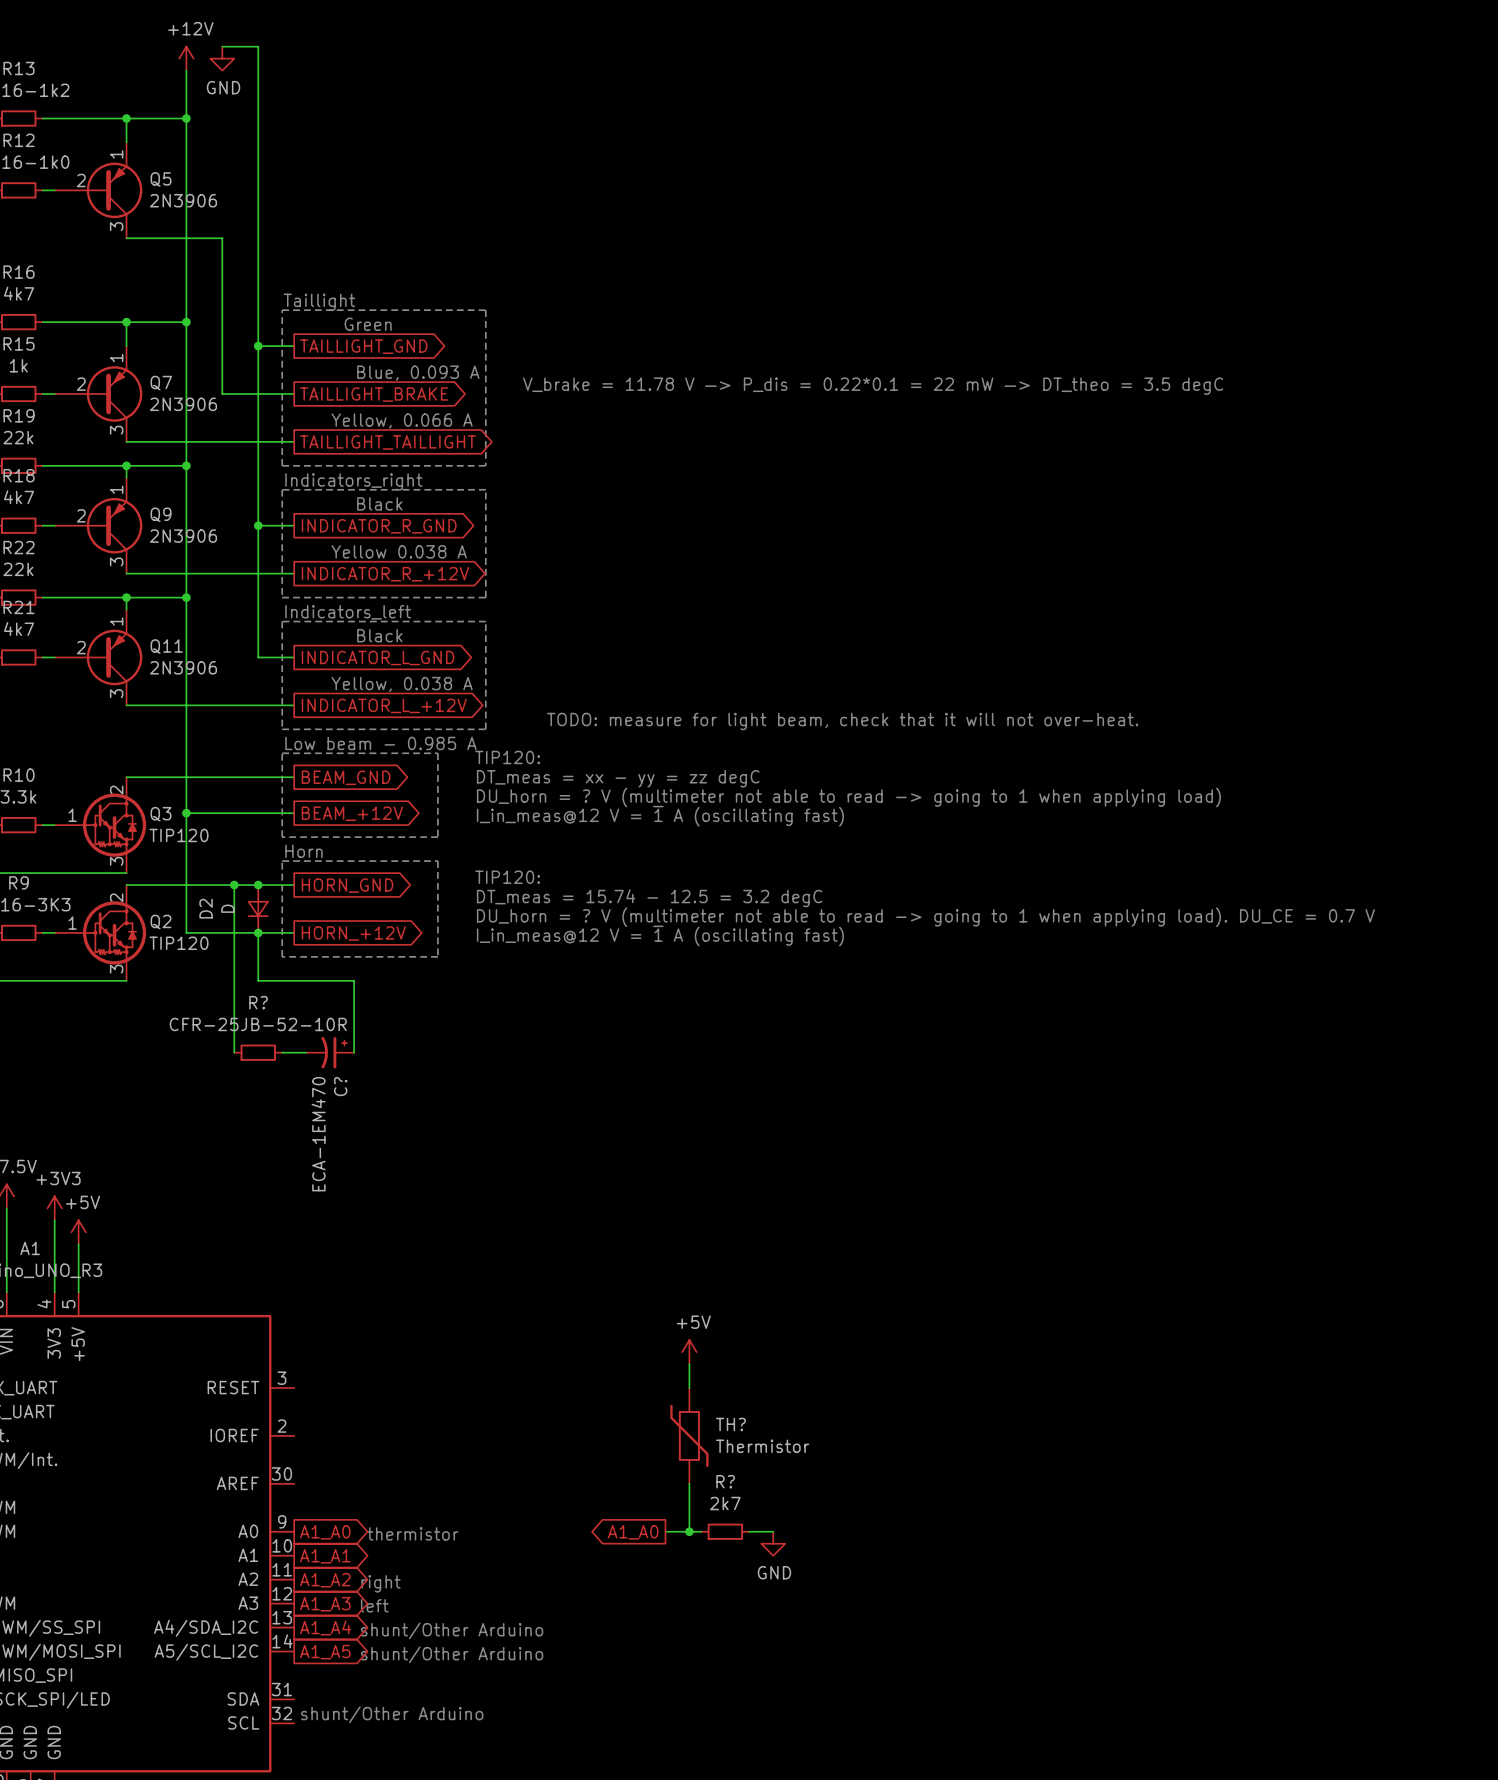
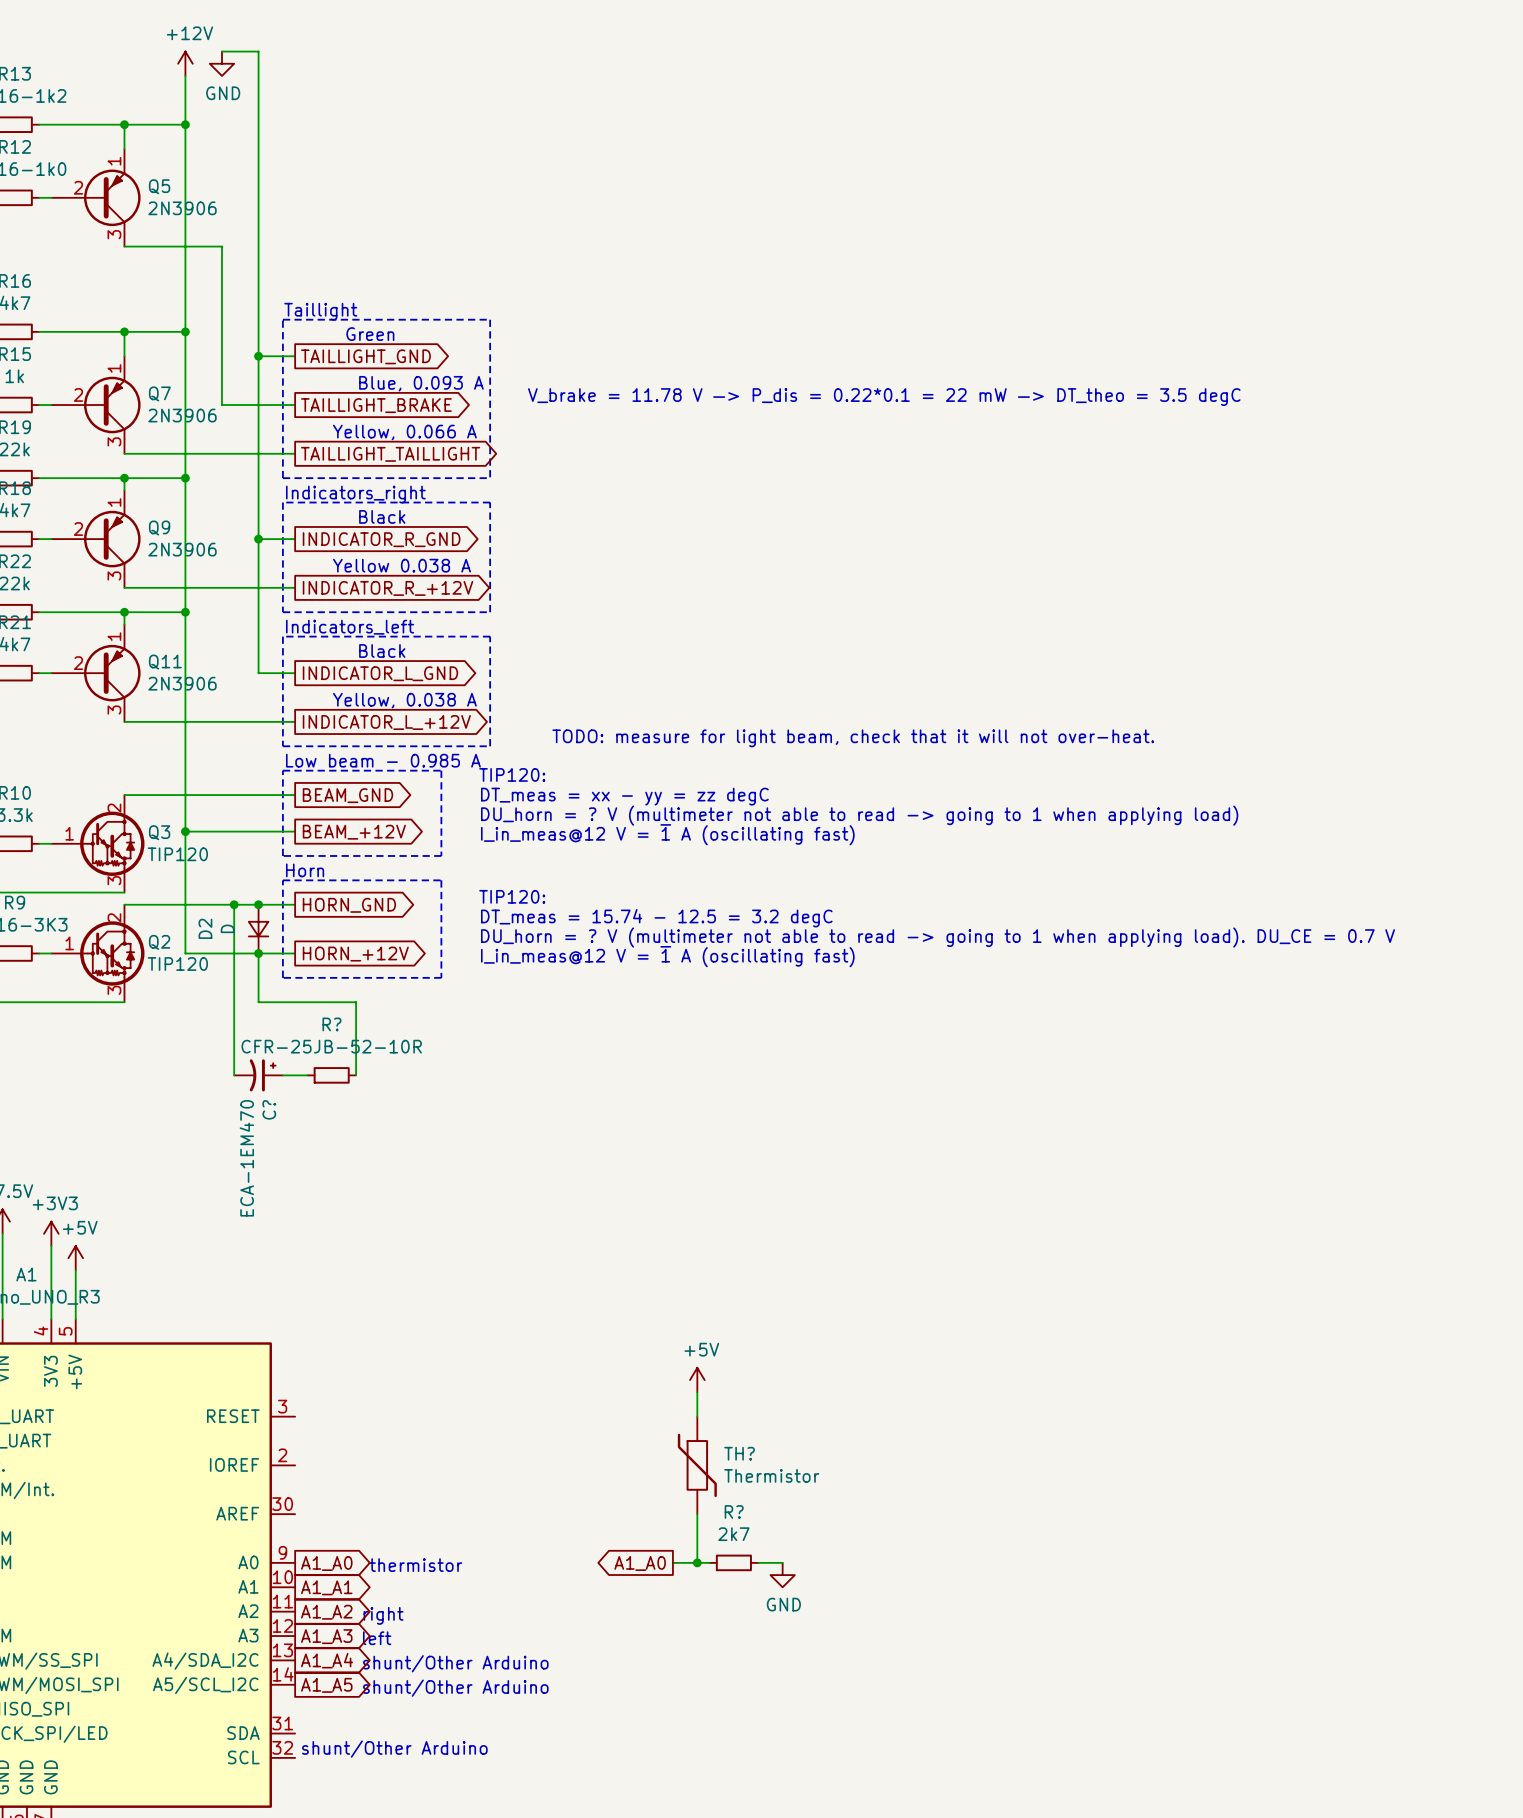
R? position: (258, 1052) -> (331, 1075)
C? position: (330, 1052) -> (258, 1075)

